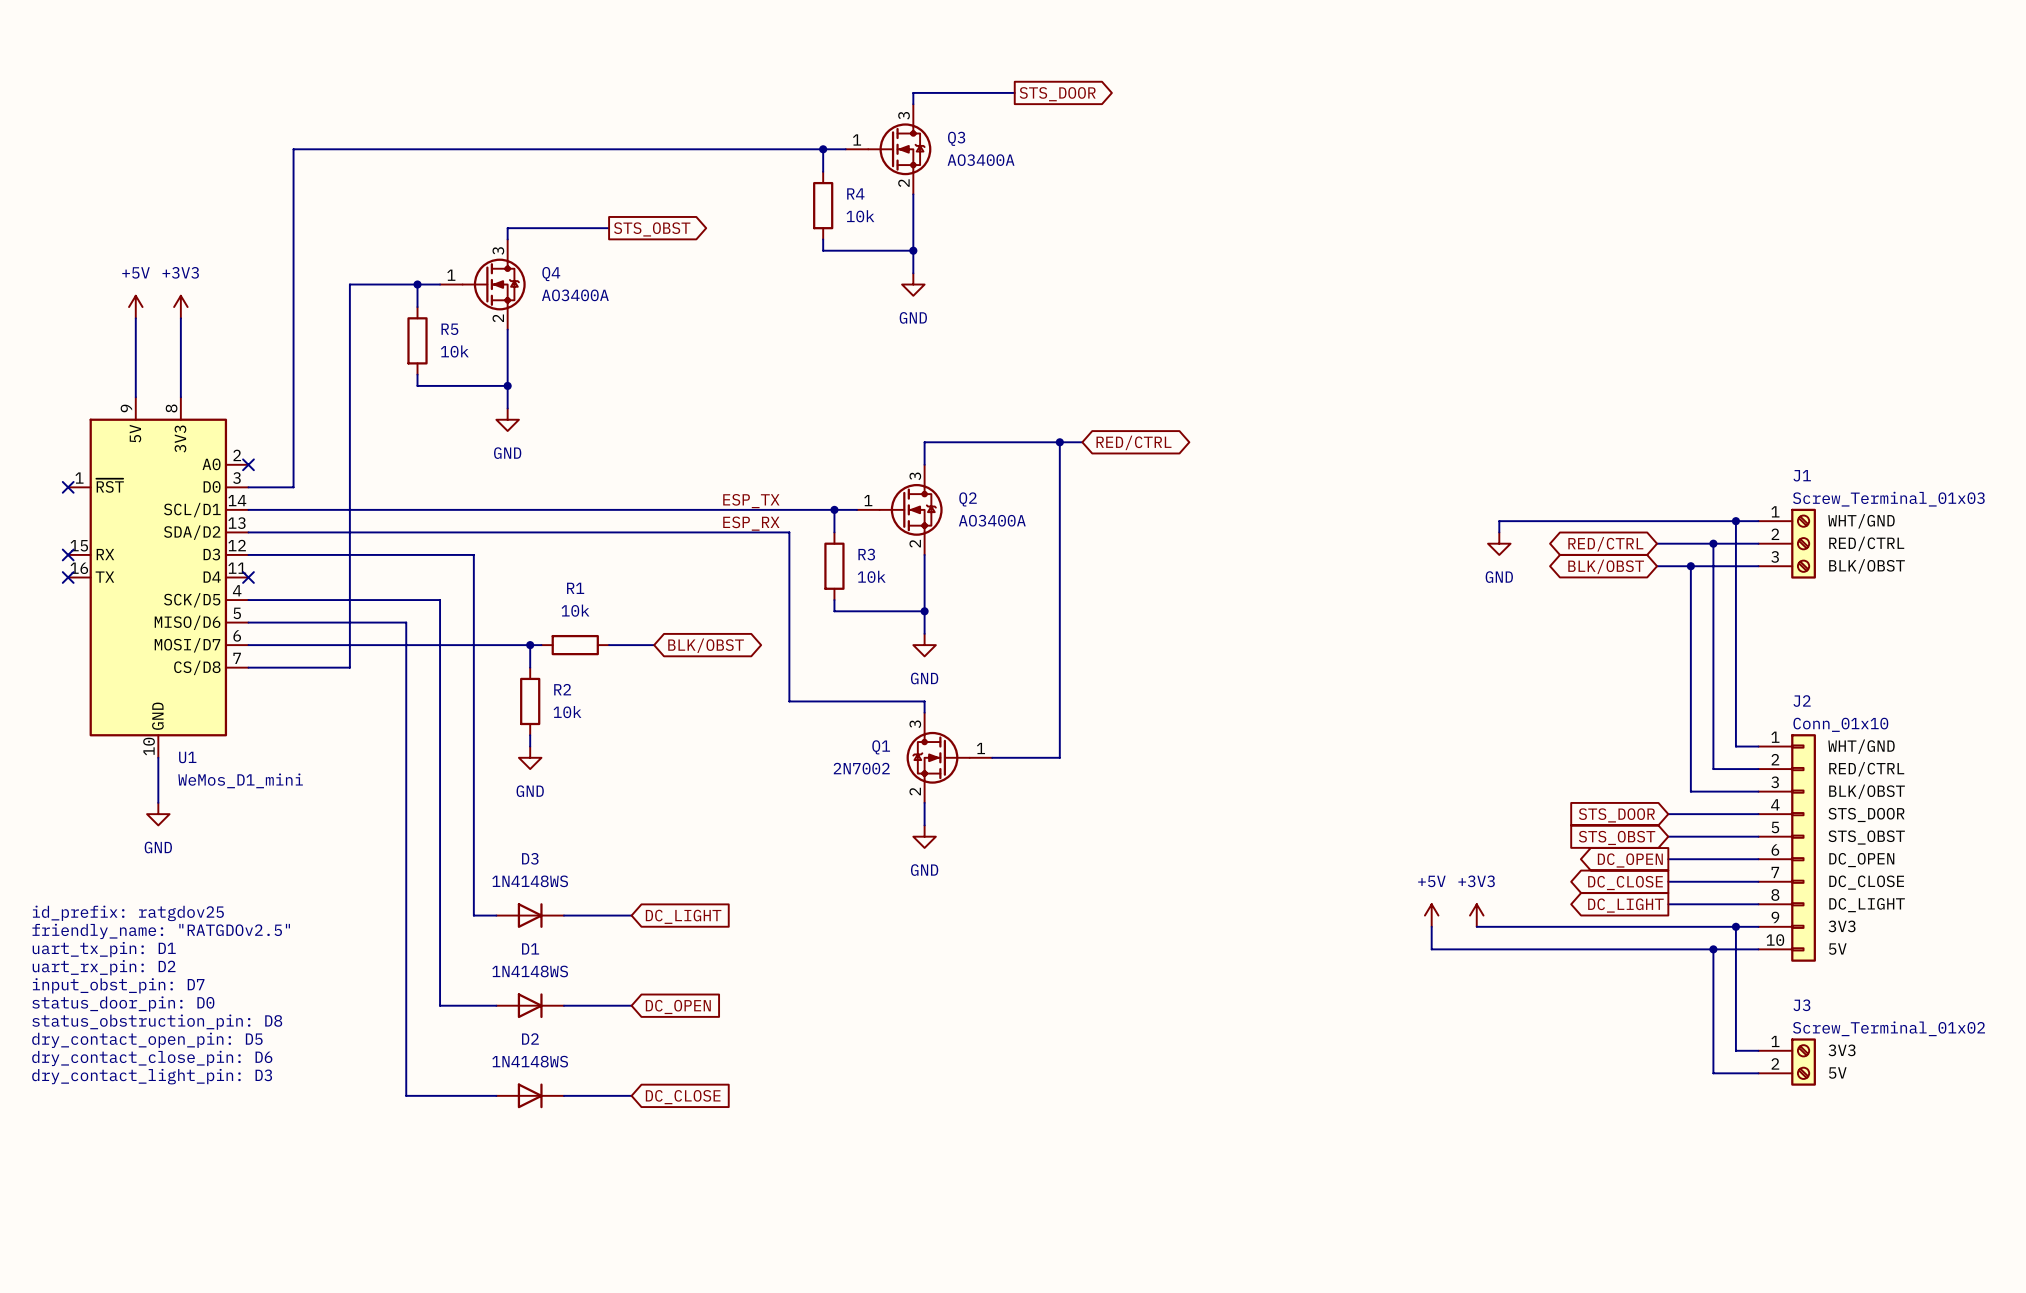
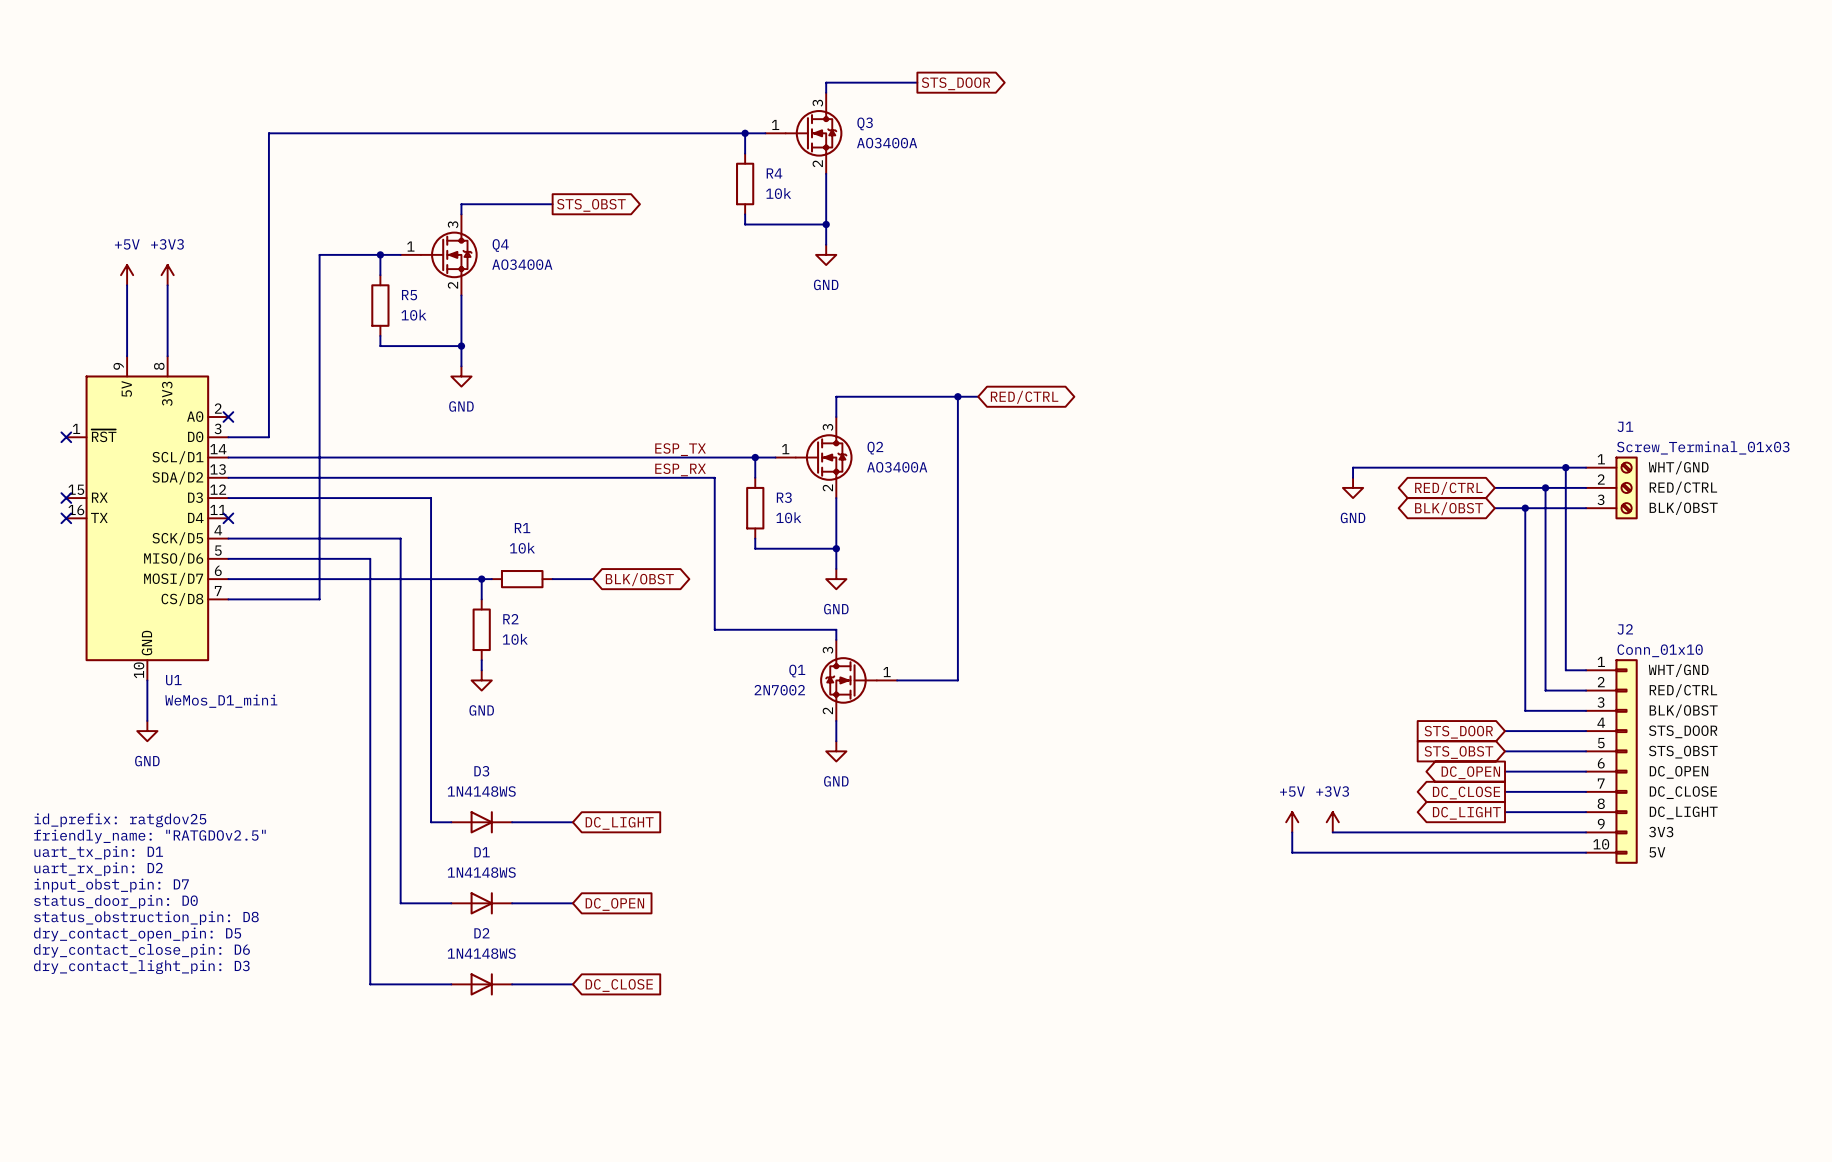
wire: (1735, 926) (1735, 1050) (1758, 1050) -> none
junction: (1735, 926) -> none
wire: (1713, 949) (1713, 1073) (1758, 1073) -> none
junction: (1713, 949) -> none
J3: Screw_Terminal_01x02 (1787, 1062) -> none

